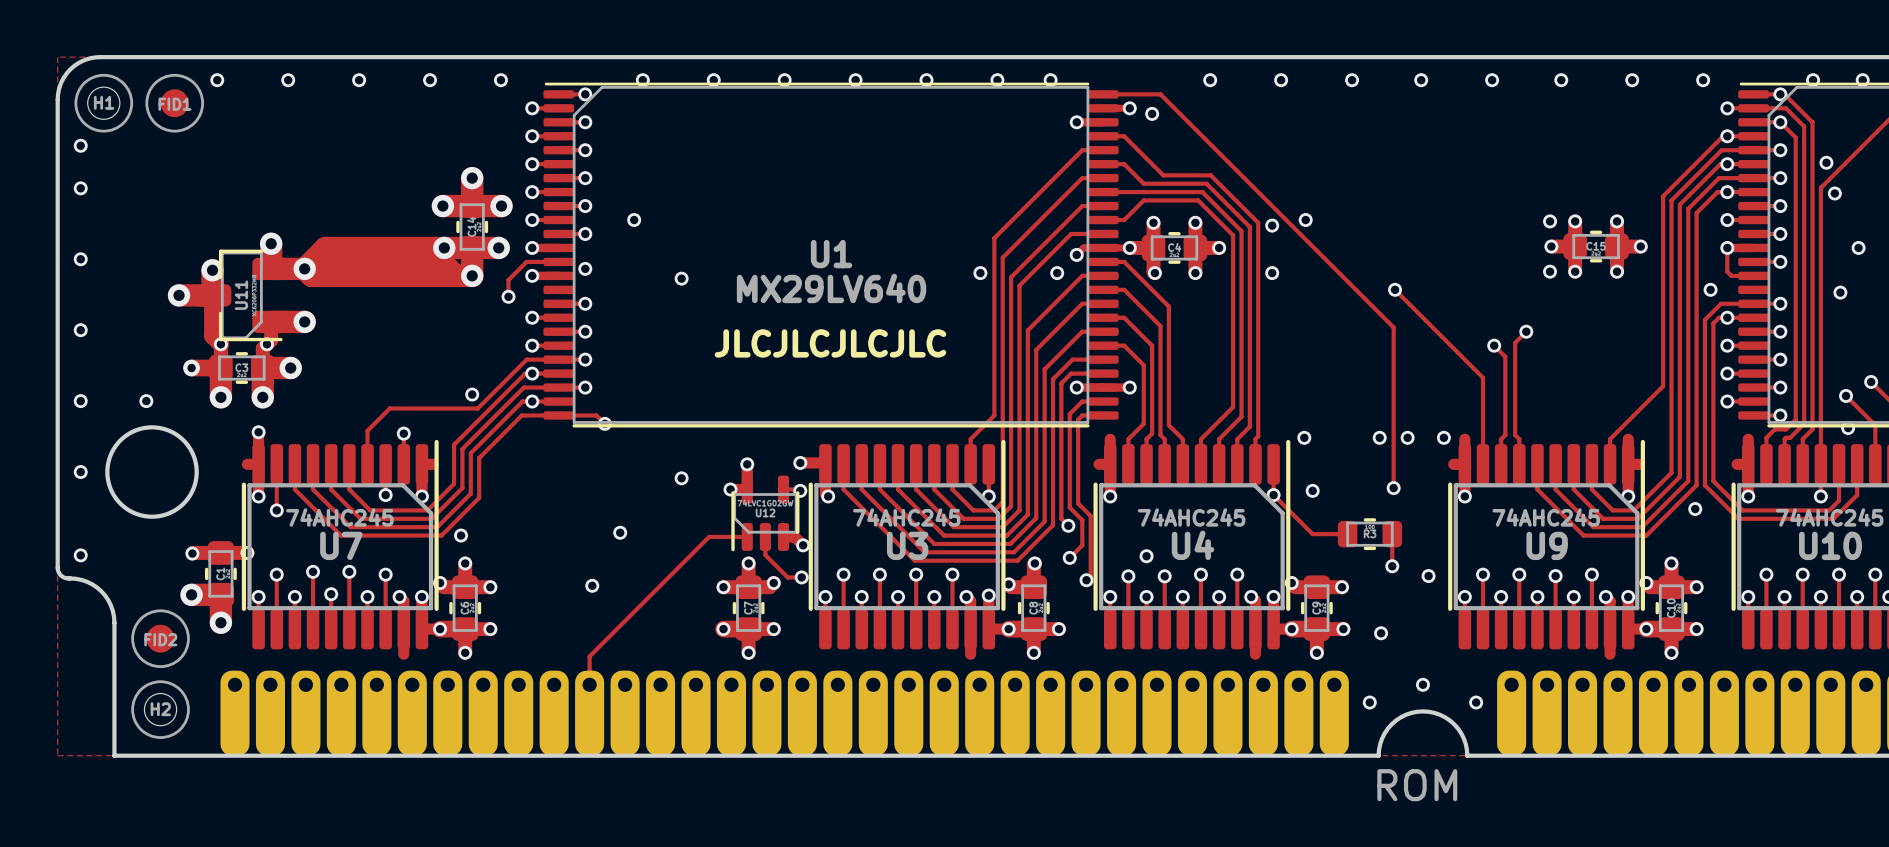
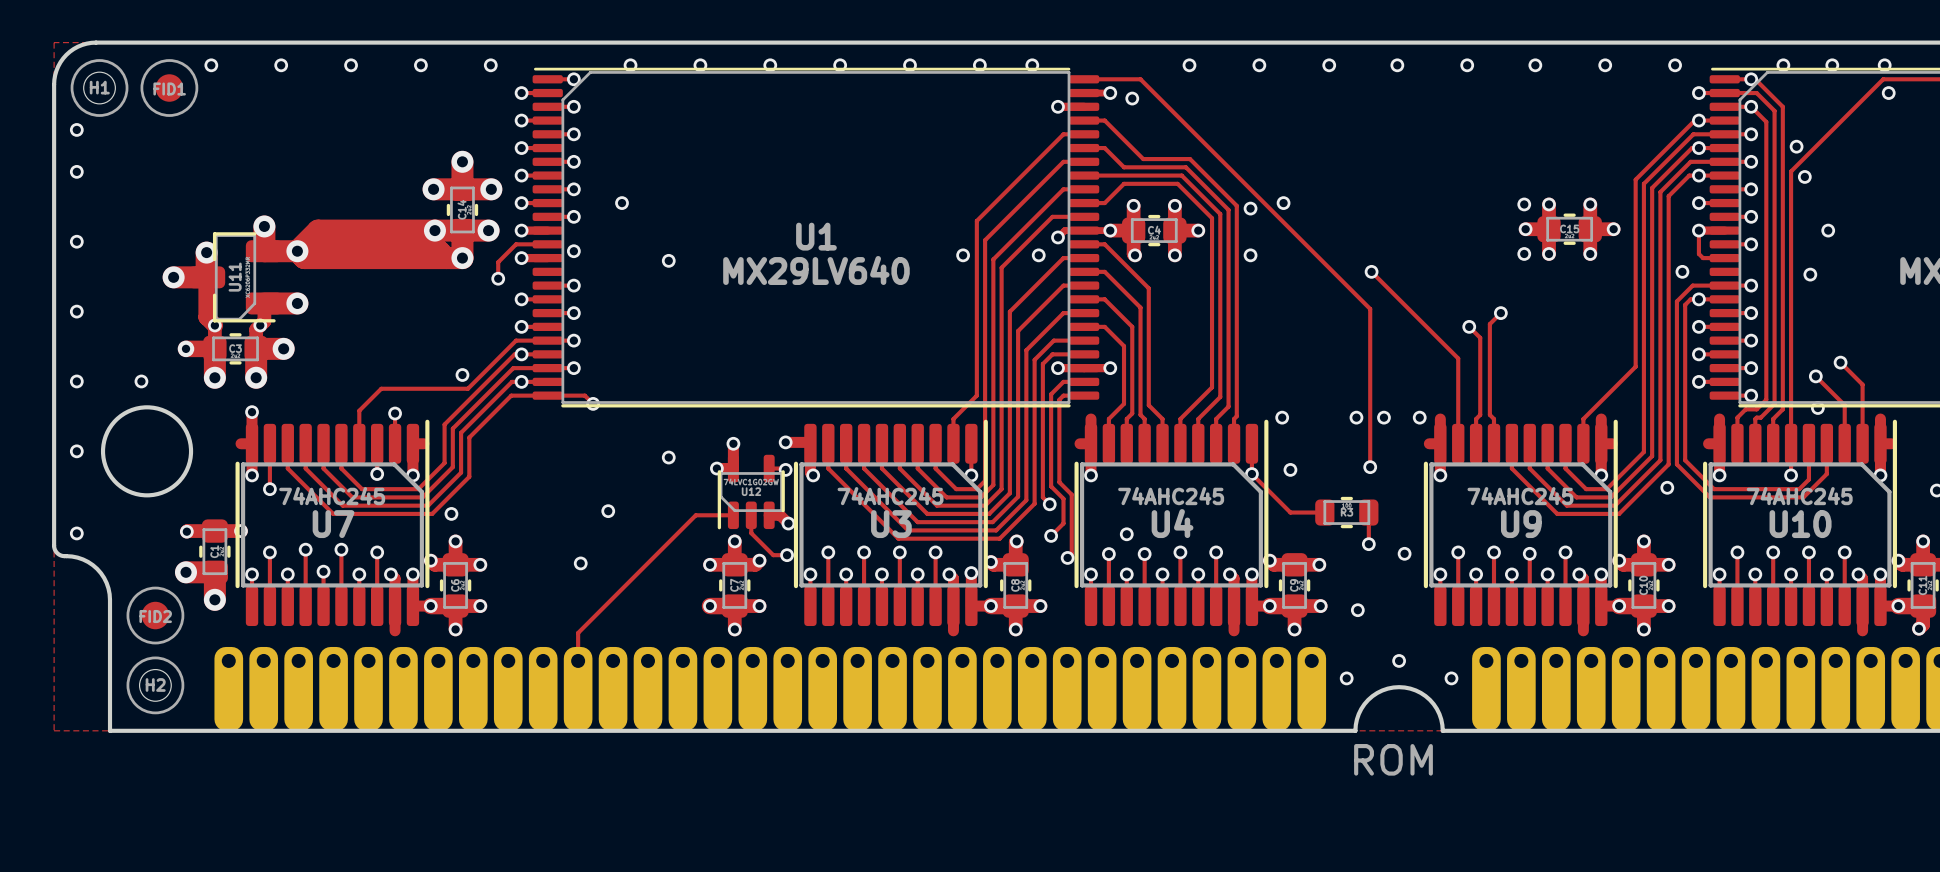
text: JLCJLCJLCJLC (830, 343) -> none

